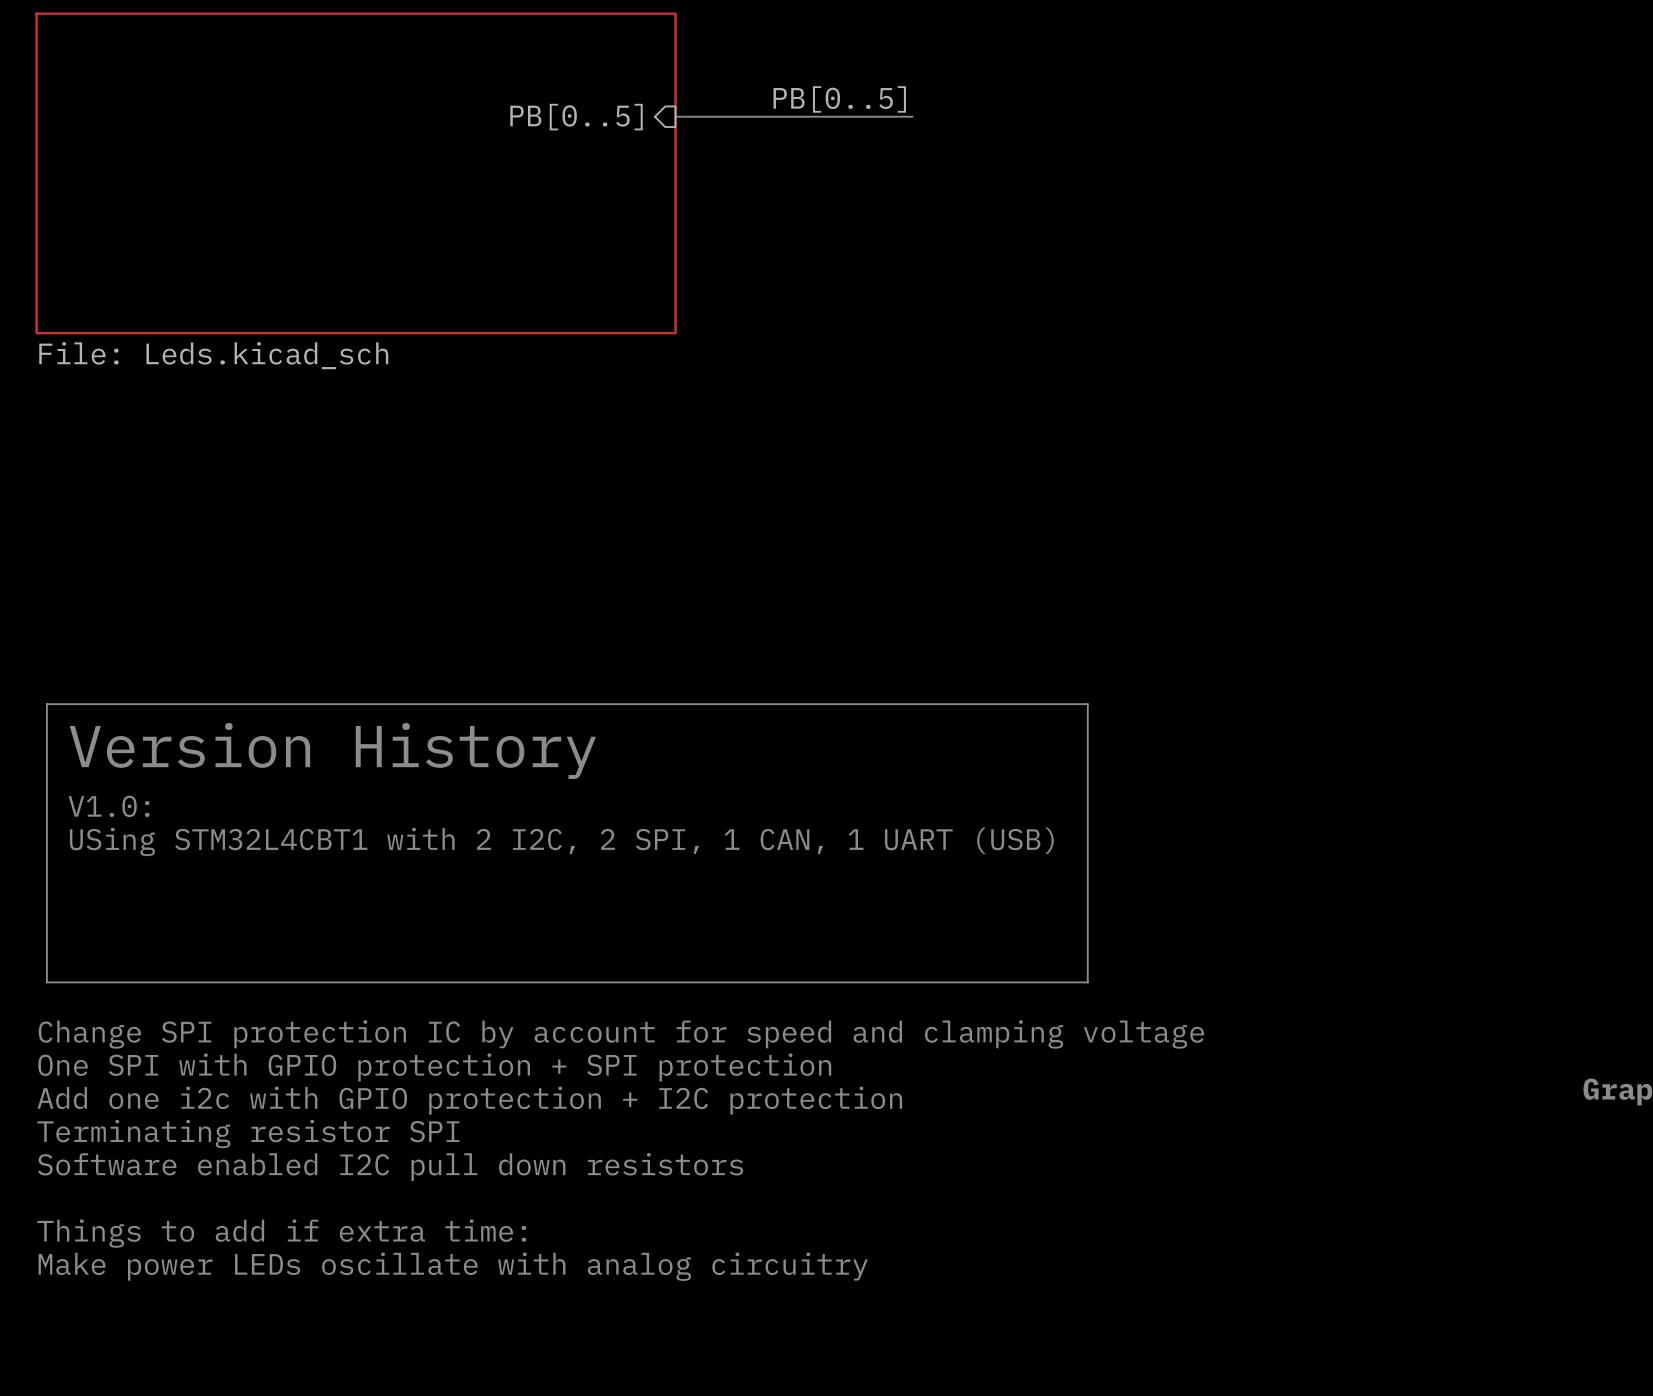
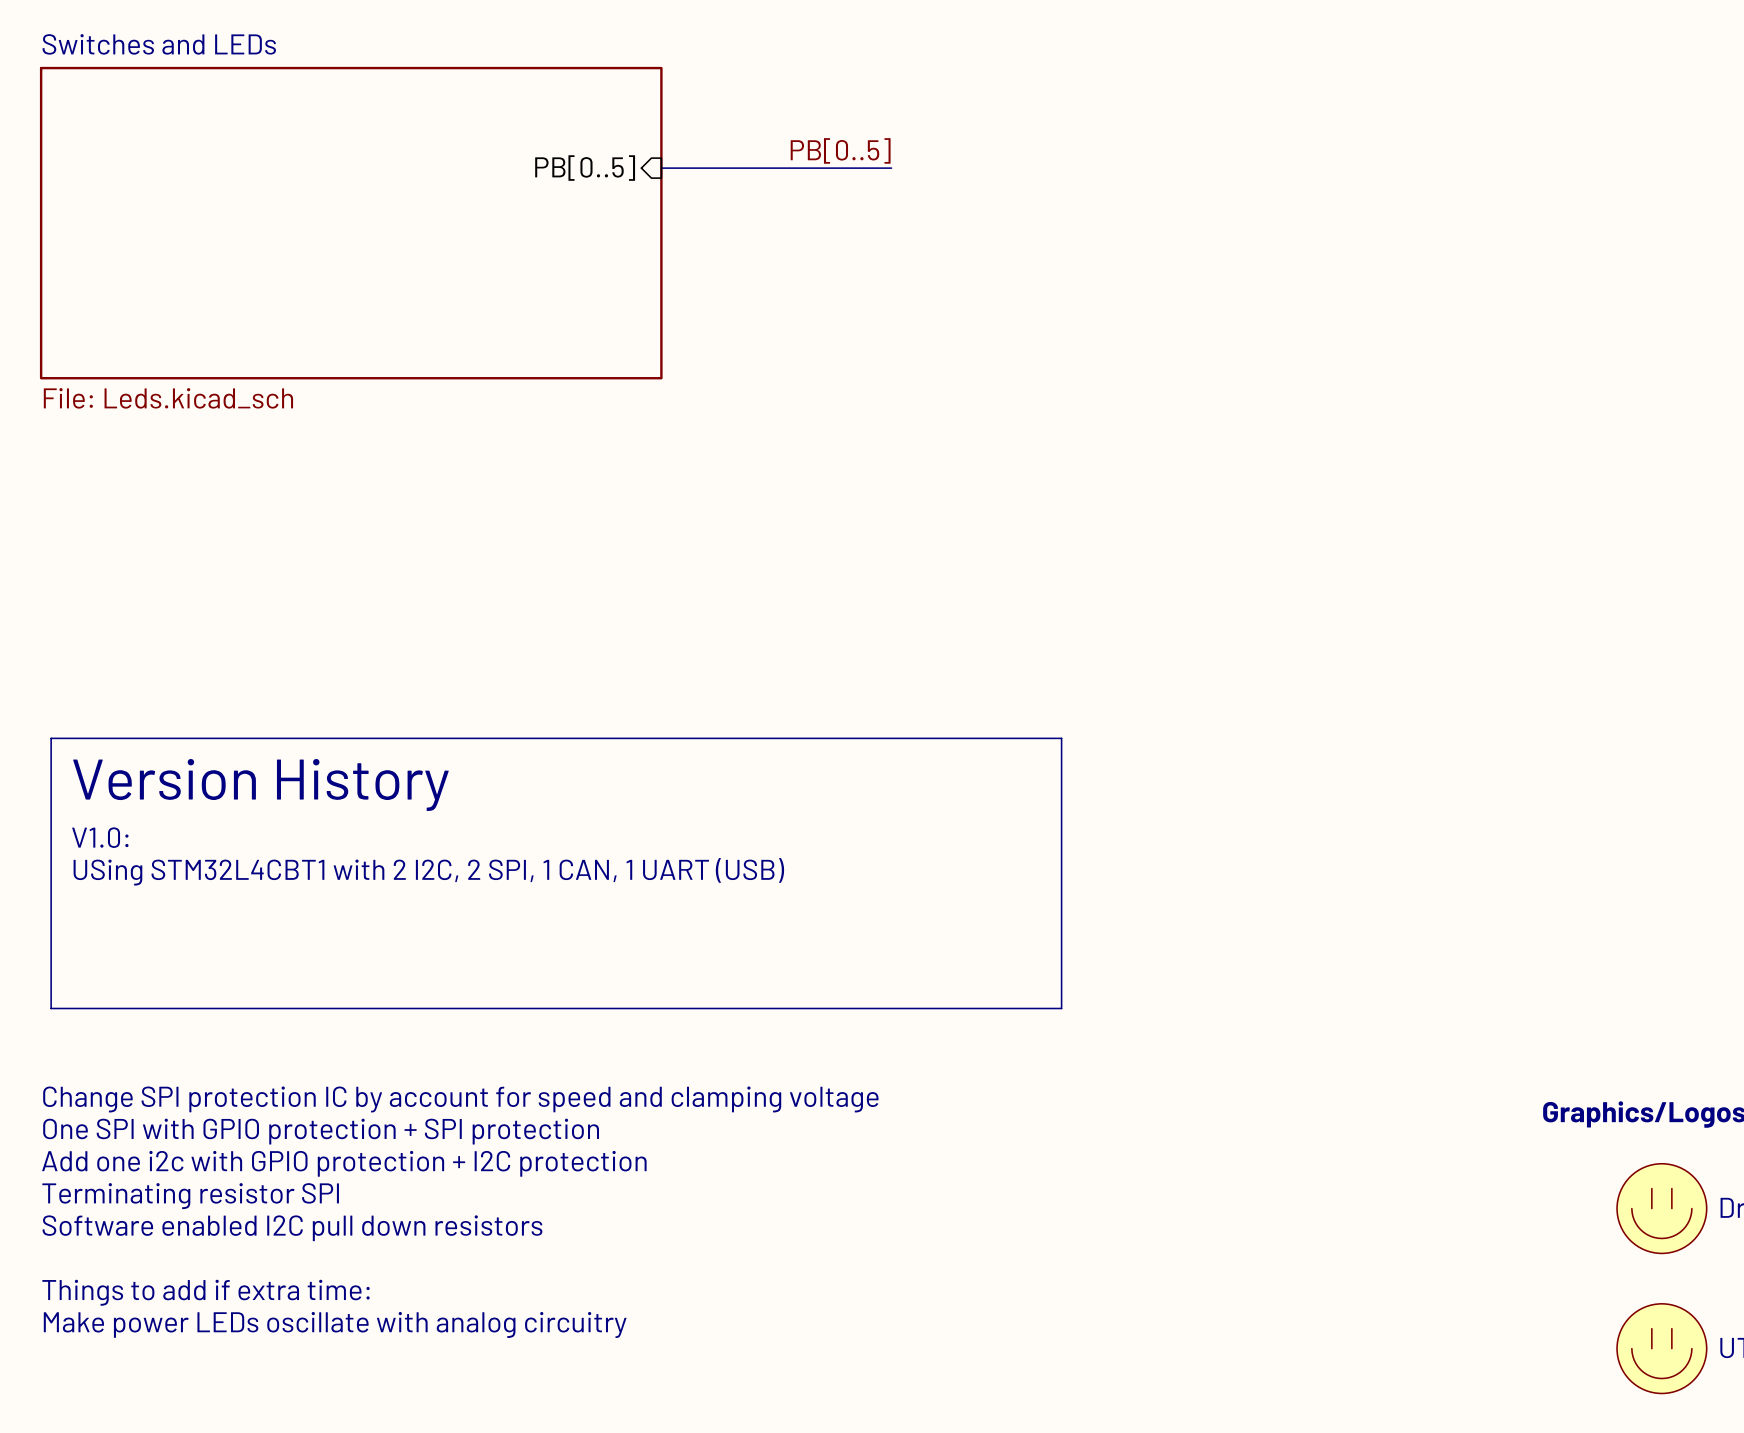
text position: Change SPI protection IC by account for speed and clamping voltage (621, 1034) -> Change SPI protection IC by account for speed and clamping voltage (460, 1099)
text position: One SPI with GPIO protection + SPI protection (434, 1067) -> One SPI with GPIO protection + SPI protection (321, 1131)
text position: Add one i2c with GPIO protection + I2C protection (469, 1100) -> Add one i2c with GPIO protection + I2C protection (344, 1163)
text position: Terminating resistor SPI (248, 1134) -> Terminating resistor SPI (190, 1196)
text position: Software enabled I2C pull down resistors (390, 1167) -> Software enabled I2C pull down resistors (292, 1228)
text position: Things to add if extra time: (281, 1233) -> Things to add if extra time: (206, 1292)
text position: Make power LEDs oscillate with analog circuitry (453, 1266) -> Make power LEDs oscillate with analog circuitry (335, 1324)

